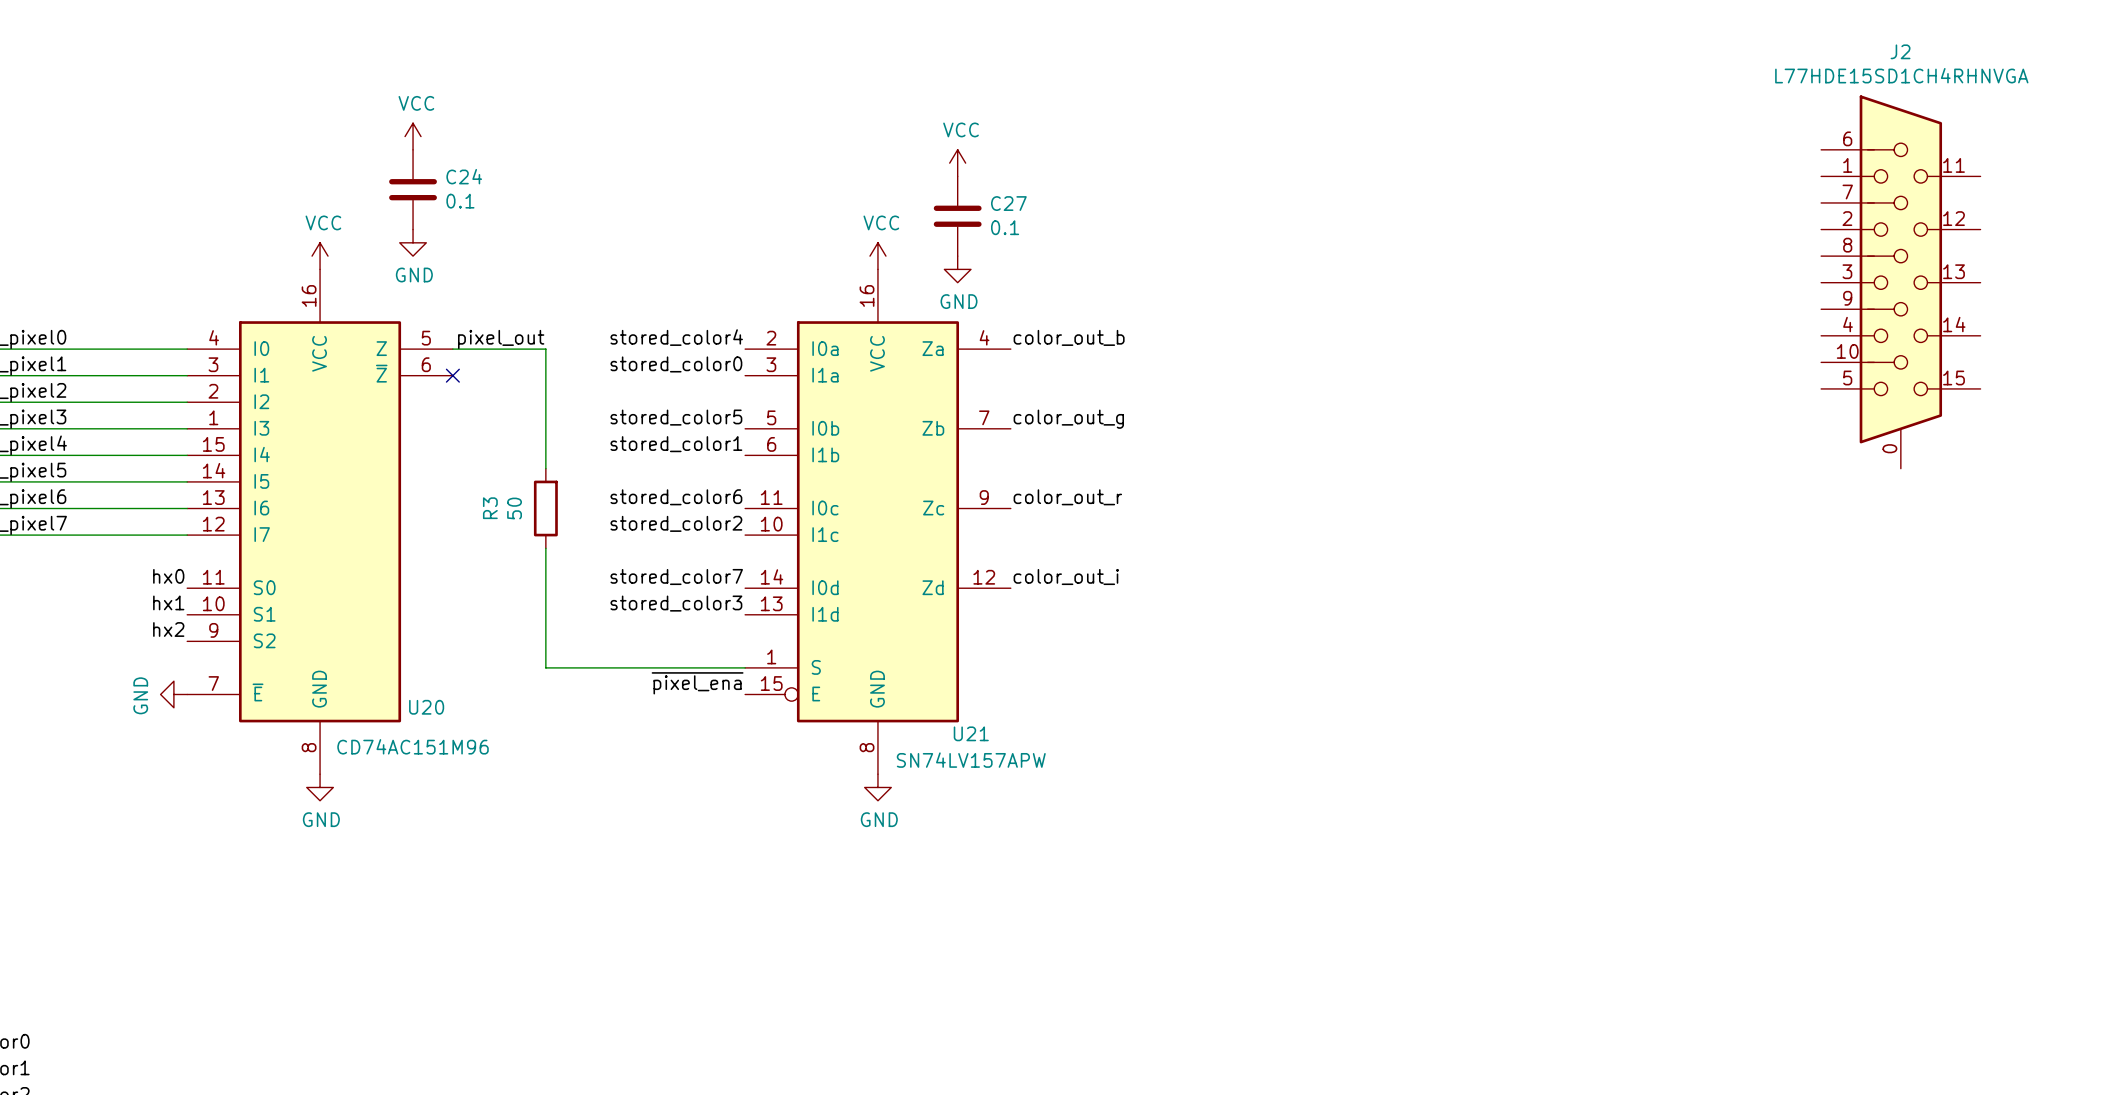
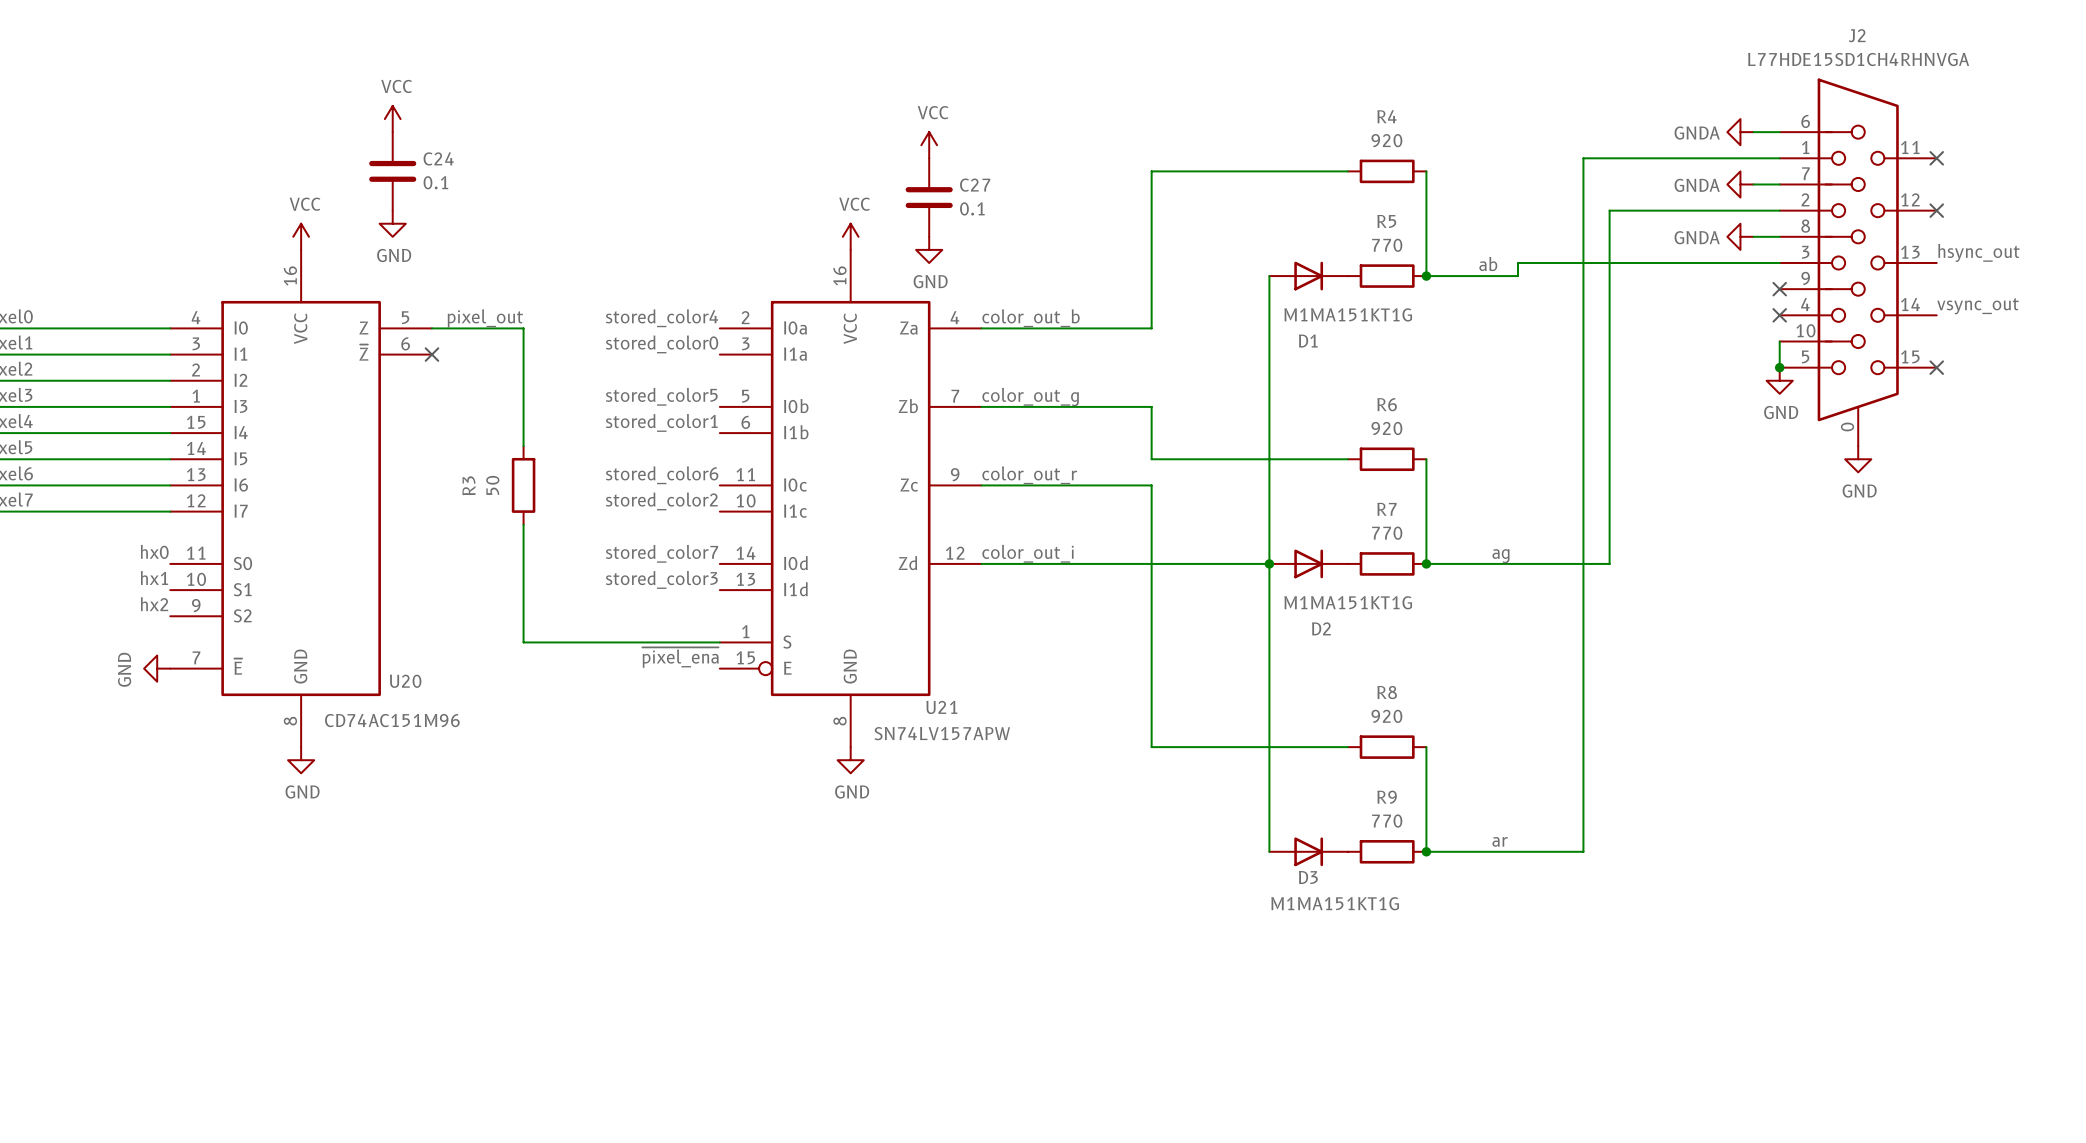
power symbol: none -> GNDA (1740, 132)
wire: none -> (1753, 132) (1779, 132)
wire: none -> (1779, 158) (1583, 158) (1583, 851) (1426, 851) (1426, 747)
no-connect mark: none -> (1936, 158)
wire: none -> (1347, 171) (1151, 171) (1151, 328) (981, 328)
R4: none -> 920 (1387, 171)
wire: none -> (1426, 171) (1426, 276) (1518, 276) (1518, 262) (1779, 262)
power symbol: none -> GNDA (1740, 184)
wire: none -> (1753, 184) (1779, 184)
wire: none -> (1779, 210) (1609, 210) (1609, 563) (1426, 563) (1426, 459)
no-connect mark: none -> (1936, 210)
power symbol: none -> GNDA (1740, 236)
wire: none -> (1753, 236) (1779, 236)
label: none -> hsync_out (1978, 252)
label: none -> ab (1488, 264)
wire: none -> (1269, 276) (1269, 851)
D1: none -> M1MA151KT1G (1308, 276)
R5: none -> 770 (1387, 276)
junction: none -> (1426, 276)
no-connect mark: none -> (1779, 289)
label: none -> vsync_out (1978, 306)
no-connect mark: none -> (1779, 315)
wire: none -> (1779, 341) (1779, 367)
junction: none -> (1779, 367)
no-connect mark: none -> (1936, 367)
power symbol: none -> GND (1779, 380)
wire: none -> (981, 406) (1151, 406) (1151, 459) (1347, 459)
R6: none -> 920 (1387, 459)
power symbol: none -> GND (1858, 459)
wire: none -> (981, 485) (1151, 485) (1151, 747) (1347, 747)
label: none -> ag (1500, 556)
wire: none -> (981, 563) (1269, 563)
junction: none -> (1269, 563)
D2: none -> M1MA151KT1G (1308, 563)
R7: none -> 770 (1387, 563)
junction: none -> (1426, 563)
R8: none -> 920 (1387, 747)
label: none -> ar (1500, 841)
D3: none -> M1MA151KT1G (1308, 851)
R9: none -> 770 (1387, 851)
junction: none -> (1426, 851)

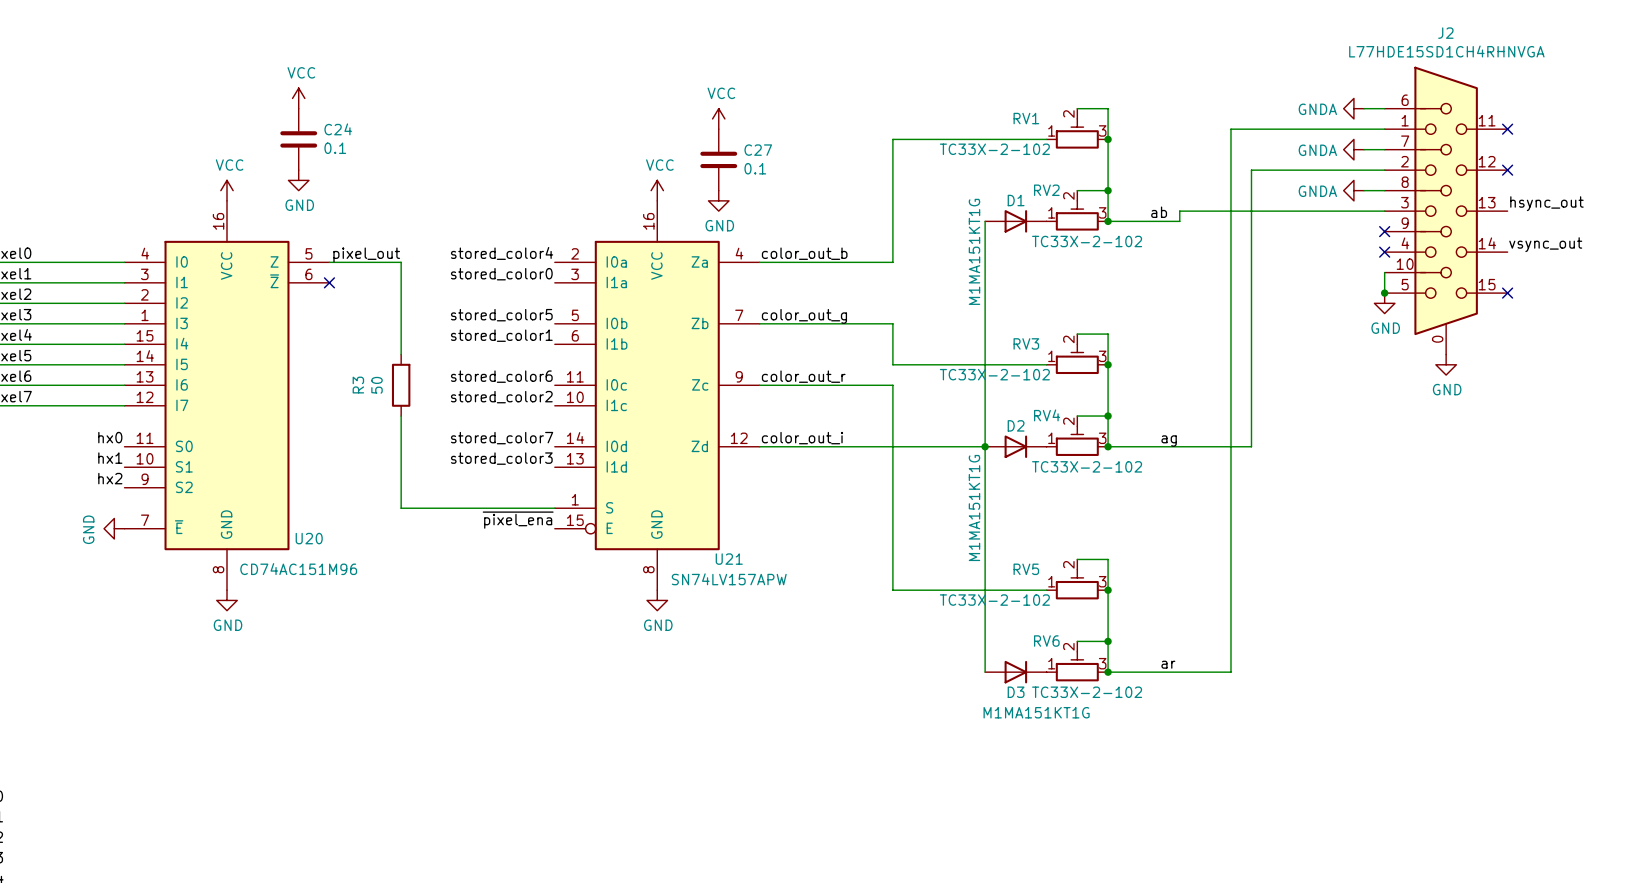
wire: none -> (1077, 108) (1108, 108) (1108, 139)
RV1: none -> TC33X-2-102 (1077, 128)
R4: 920 (1387, 171) -> none
junction: none -> (1108, 139)
wire: none -> (1077, 190) (1108, 190)
junction: none -> (1108, 190)
RV2: none -> TC33X-2-102 (1077, 210)
R5: 770 (1387, 276) -> none
D1 value rotation: 0° (1348, 314) -> 90° counterclockwise (974, 251)
D1 name position: D1 (1308, 341) -> D1 (1016, 200)
wire: none -> (1077, 334) (1108, 334) (1108, 364)
RV3: none -> TC33X-2-102 (1077, 354)
R6: 920 (1387, 459) -> none
junction: none -> (1108, 364)
wire: none -> (1077, 416) (1108, 416)
junction: none -> (1108, 416)
RV4: none -> TC33X-2-102 (1077, 436)
R7: 770 (1387, 563) -> none
D2 value rotation: 0° (1348, 602) -> 90° counterclockwise (974, 507)
D2 name position: D2 (1321, 628) -> D2 (1016, 425)
wire: none -> (1077, 559) (1108, 559) (1108, 590)
RV5: none -> TC33X-2-102 (1077, 579)
R8: 920 (1387, 747) -> none
junction: none -> (1108, 590)
wire: none -> (1077, 641) (1108, 641)
junction: none -> (1108, 641)
RV6: none -> TC33X-2-102 (1077, 661)
R9: 770 (1387, 851) -> none

